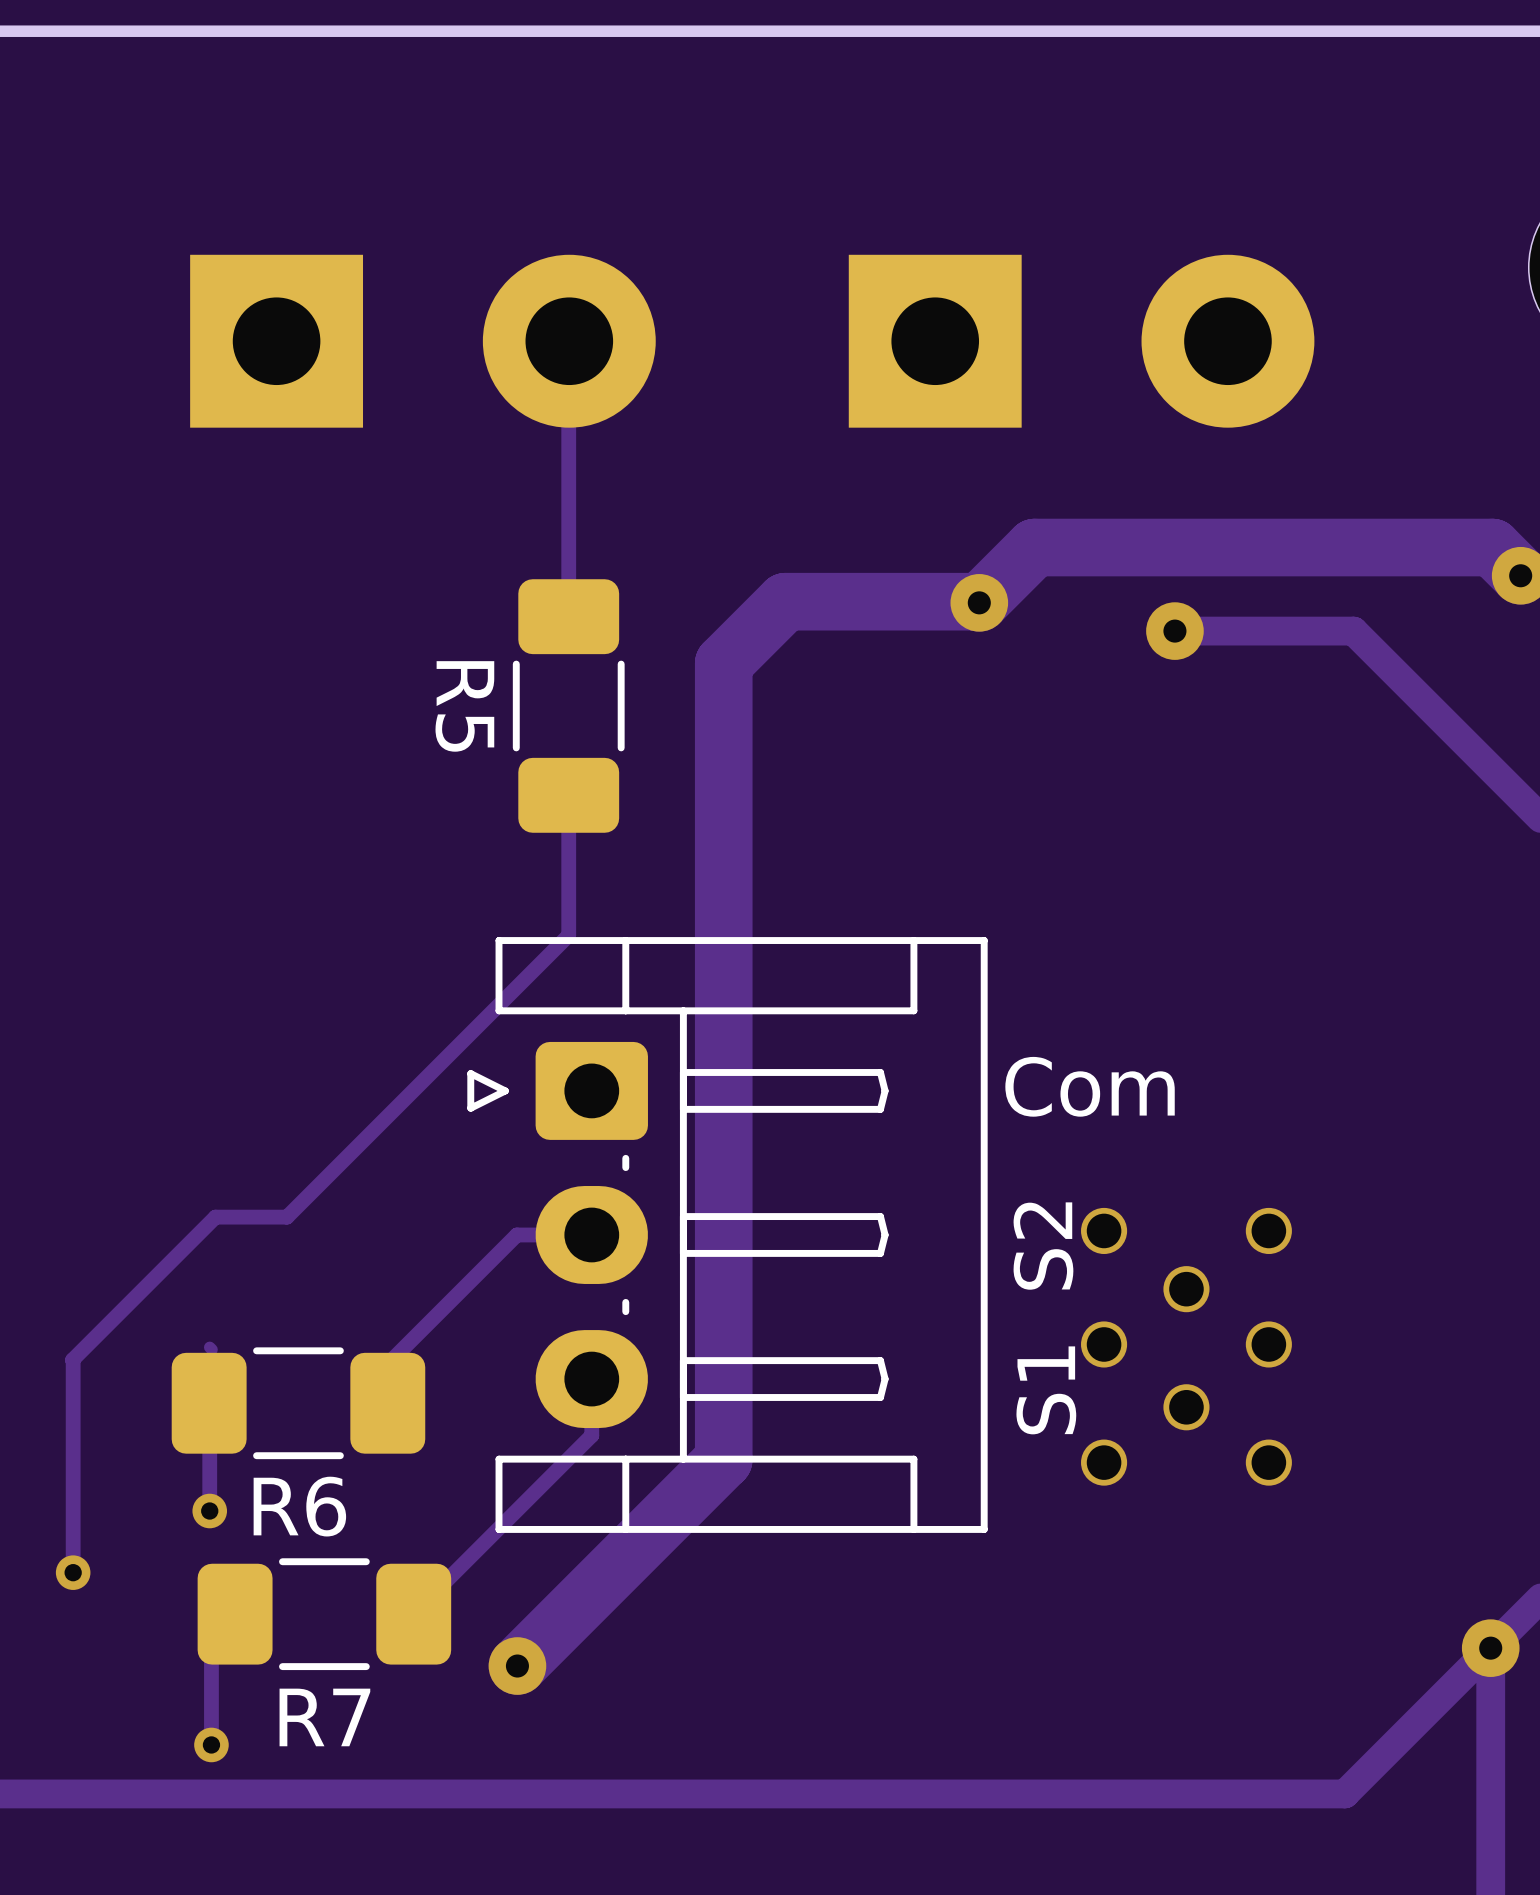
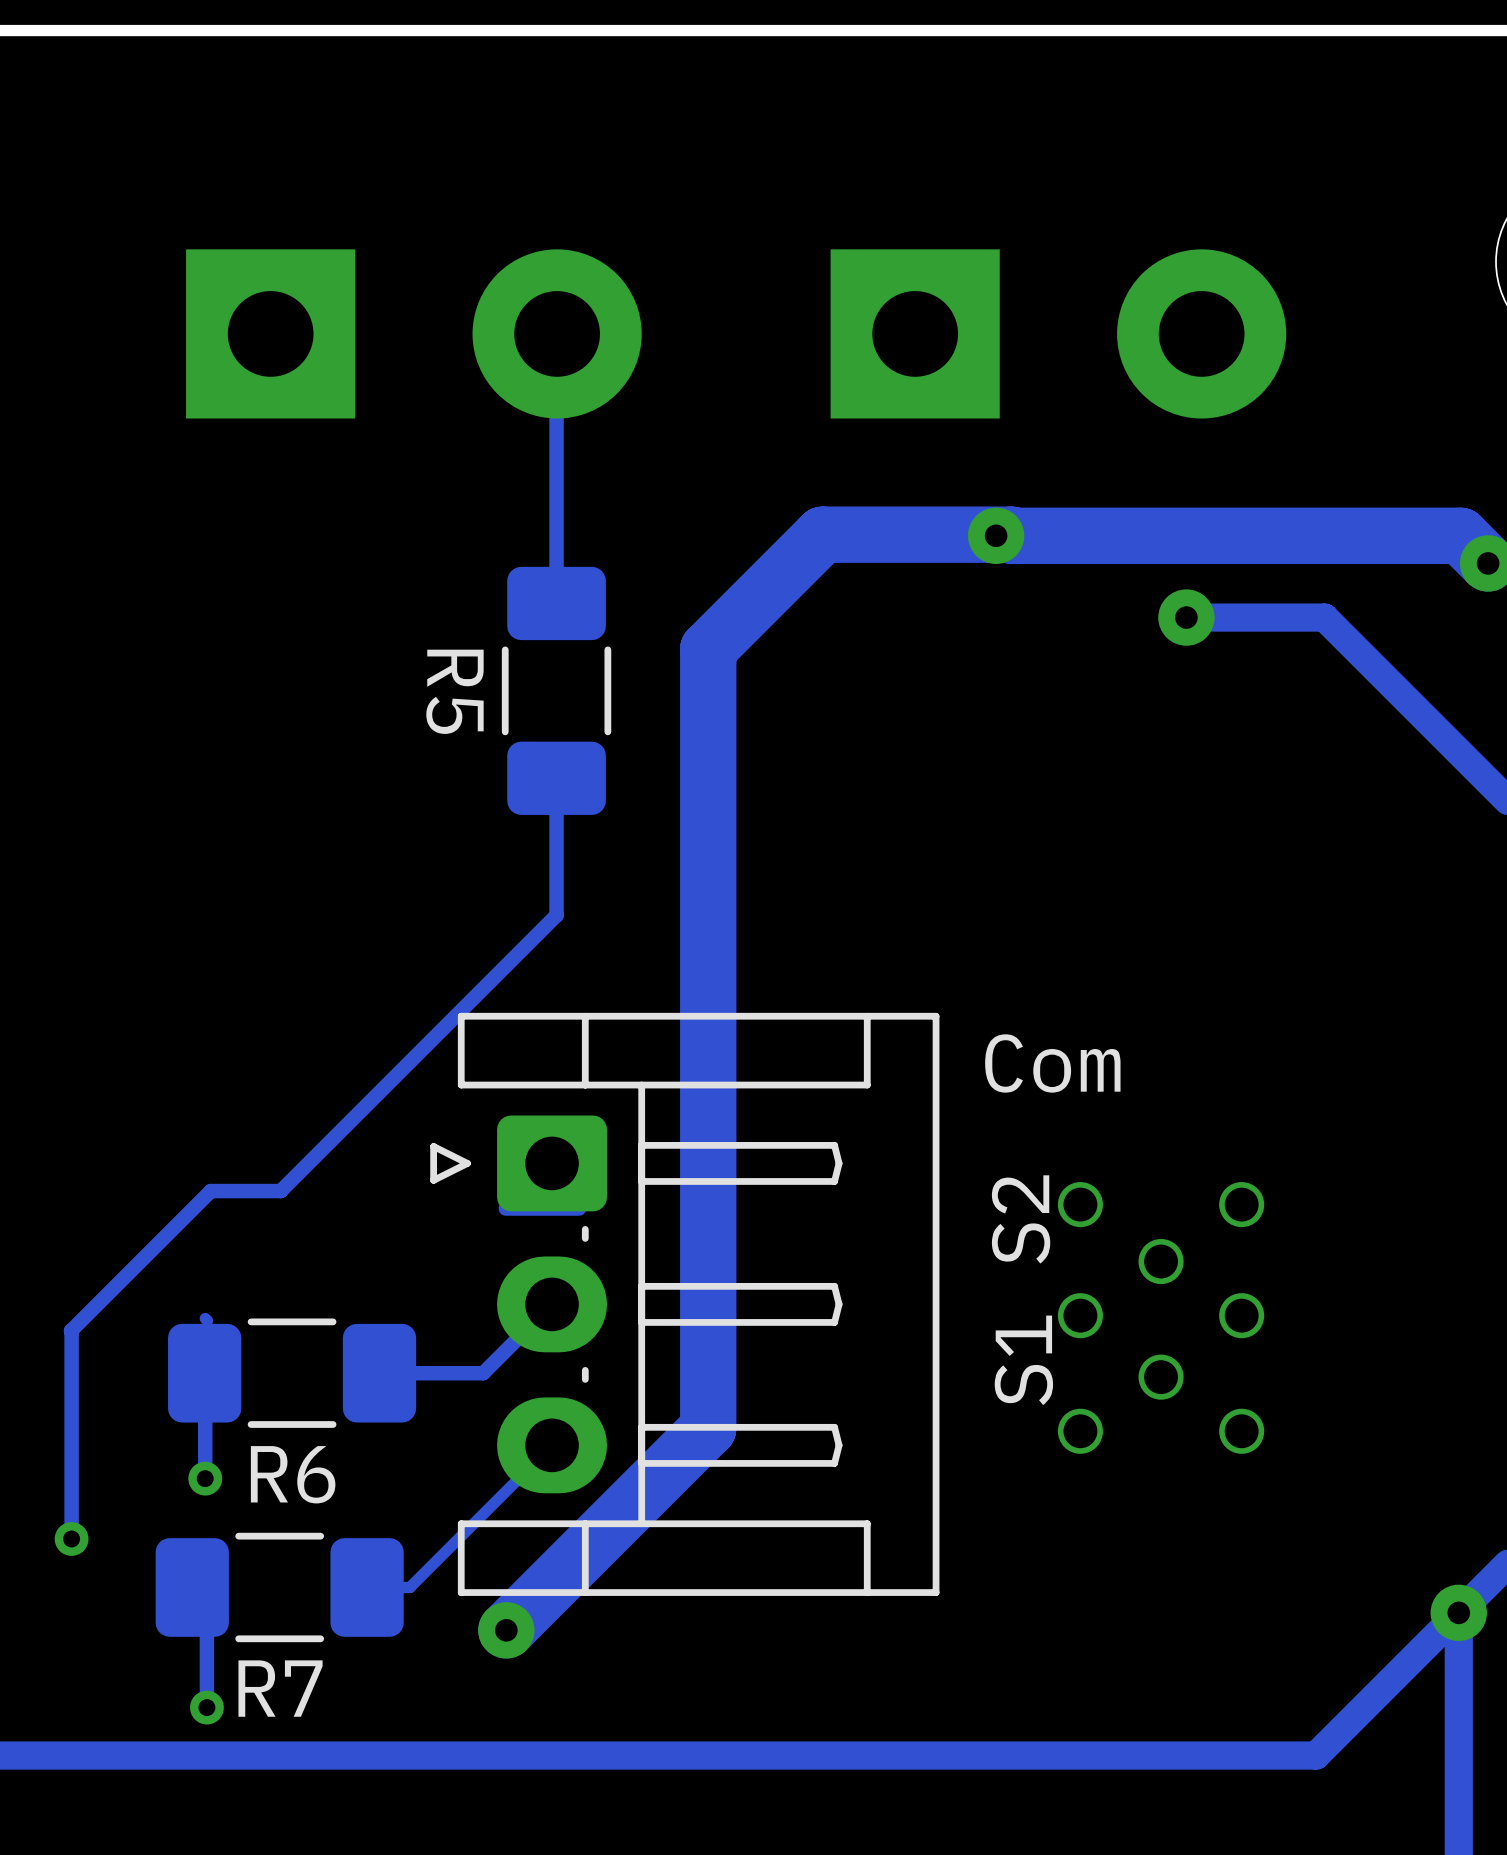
track: (1034, 547) (979, 602) (785, 601) -> (1010, 535) (1012, 535) (822, 534) (768, 588)
via position: (979, 602) -> (996, 535)
via position: (1174, 631) -> (1186, 617)
track: (516, 1234) (387, 1364) -> none
part position: (727, 1234) -> (684, 1304)
track: none -> (552, 1304) (483, 1373) (379, 1373)
track: (591, 1379) (591, 1435) (413, 1613) -> none
track: none -> (552, 1445) (409, 1587) (367, 1587)
R7 position: (324, 1614) -> (279, 1587)

